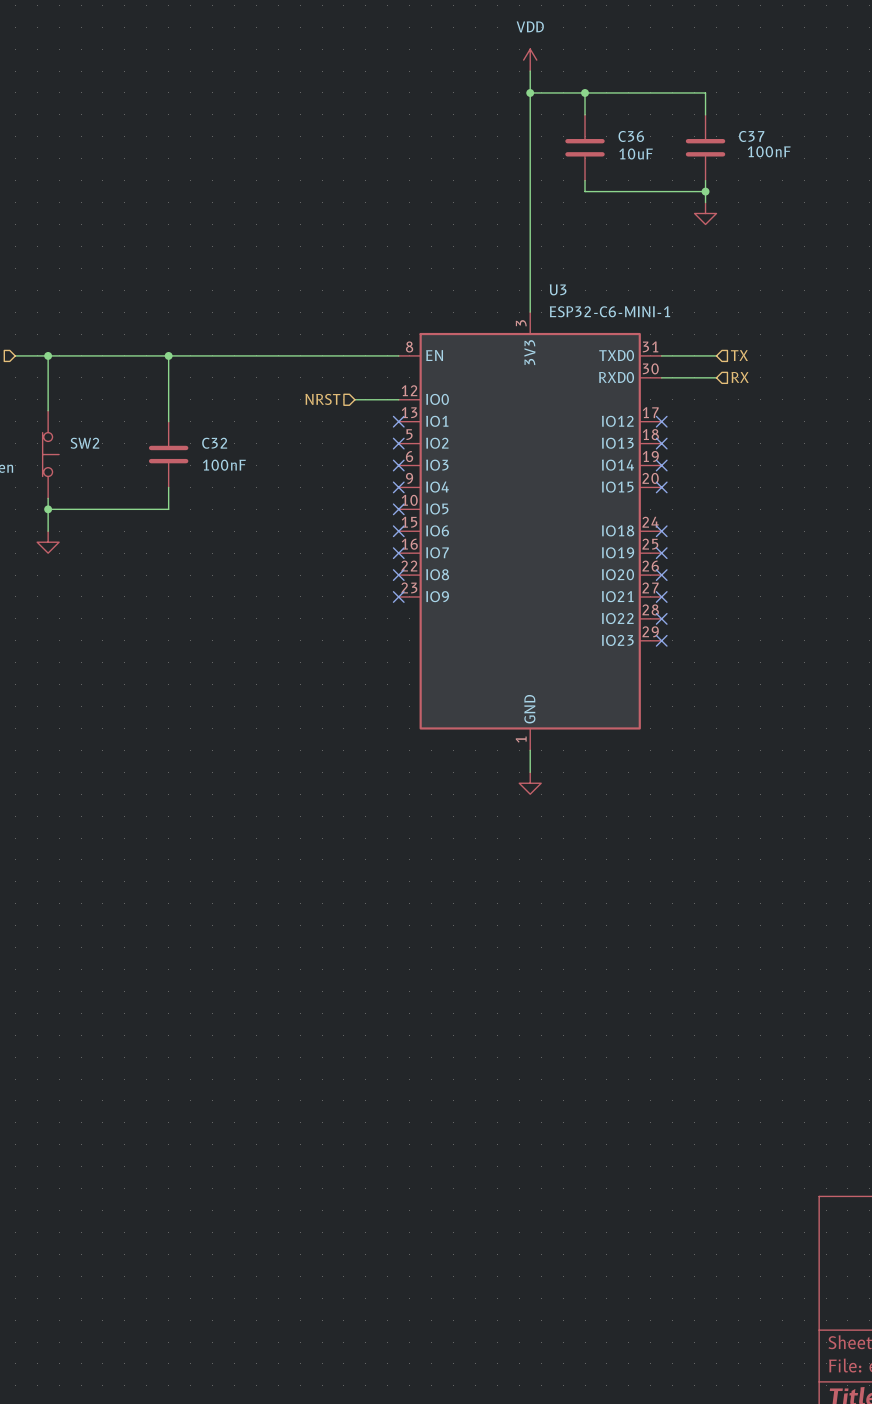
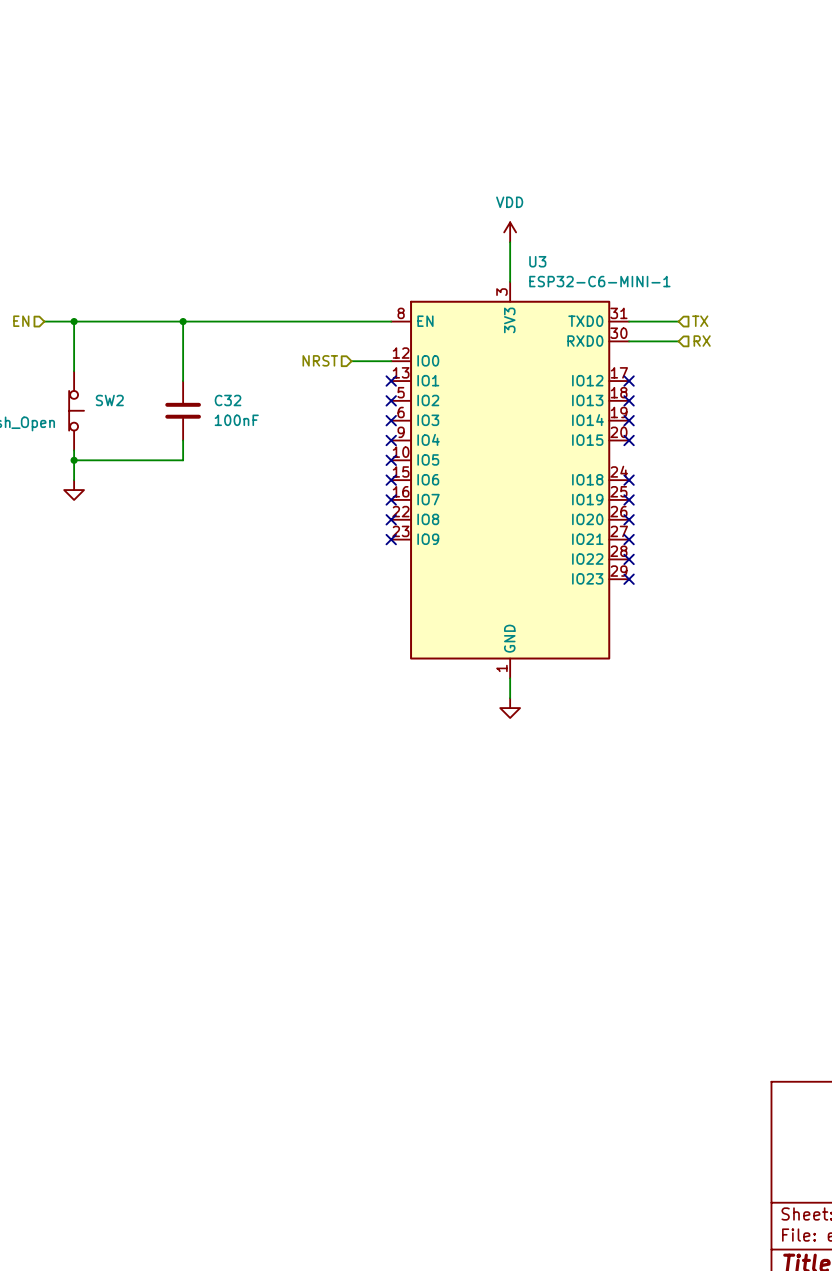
power symbol position: VDD (530, 60) -> VDD (510, 232)
wire: (530, 71) (530, 268) -> none
wire: (530, 92) (705, 92) (705, 114) -> none
junction: (530, 92) -> none
wire: (585, 92) (585, 114) -> none
junction: (585, 92) -> none
C36: 10uF (585, 147) -> none
C37: 100nF (705, 147) -> none
wire: (585, 180) (585, 191) (705, 191) -> none
wire: (705, 180) (705, 202) -> none
junction: (705, 191) -> none
power symbol: (705, 213) -> none

